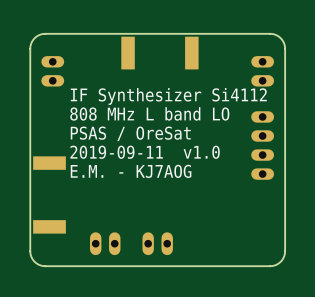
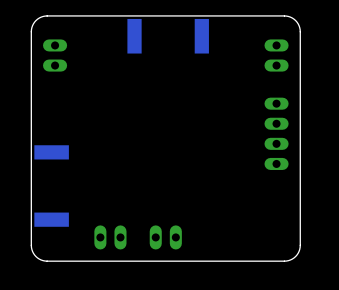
text: IF Synthesizer Si4112 (168, 96) -> none
text: 808 MHz L band LO (149, 113) -> none
text: PSAS / OreSat (130, 133) -> none
text: 2019-09-11 v1.0 (145, 152) -> none
text: E.M. - KJ7AOG (131, 171) -> none

